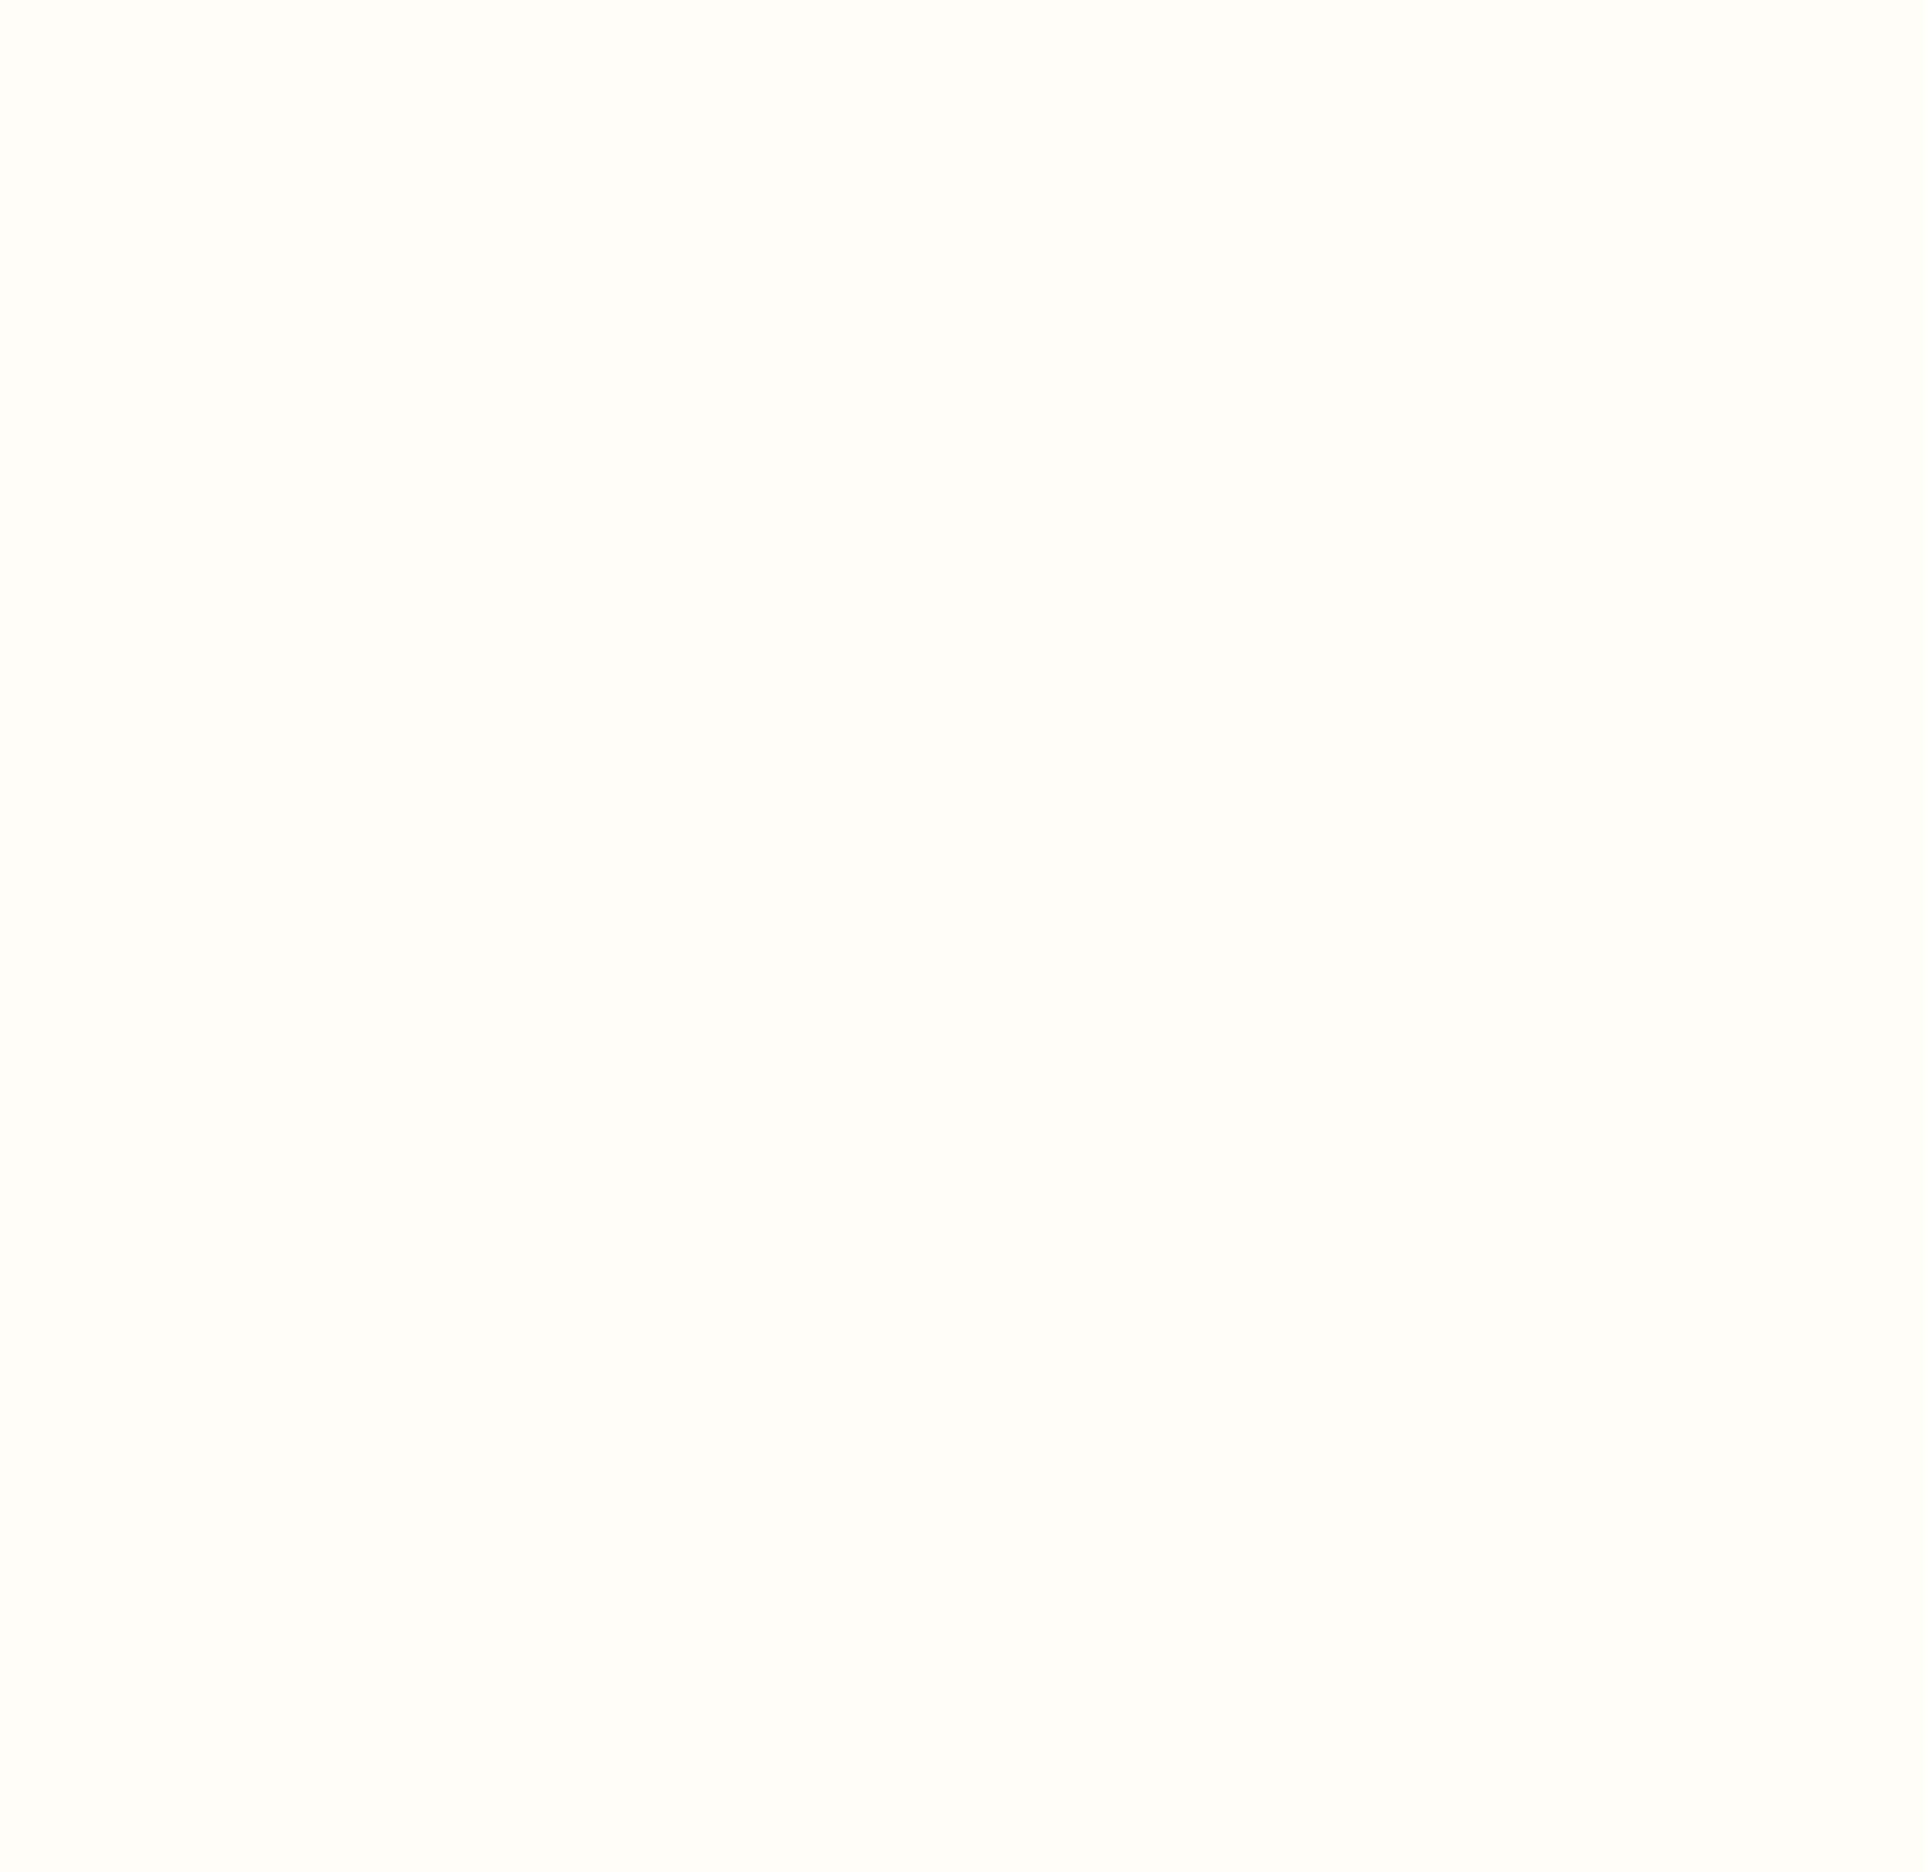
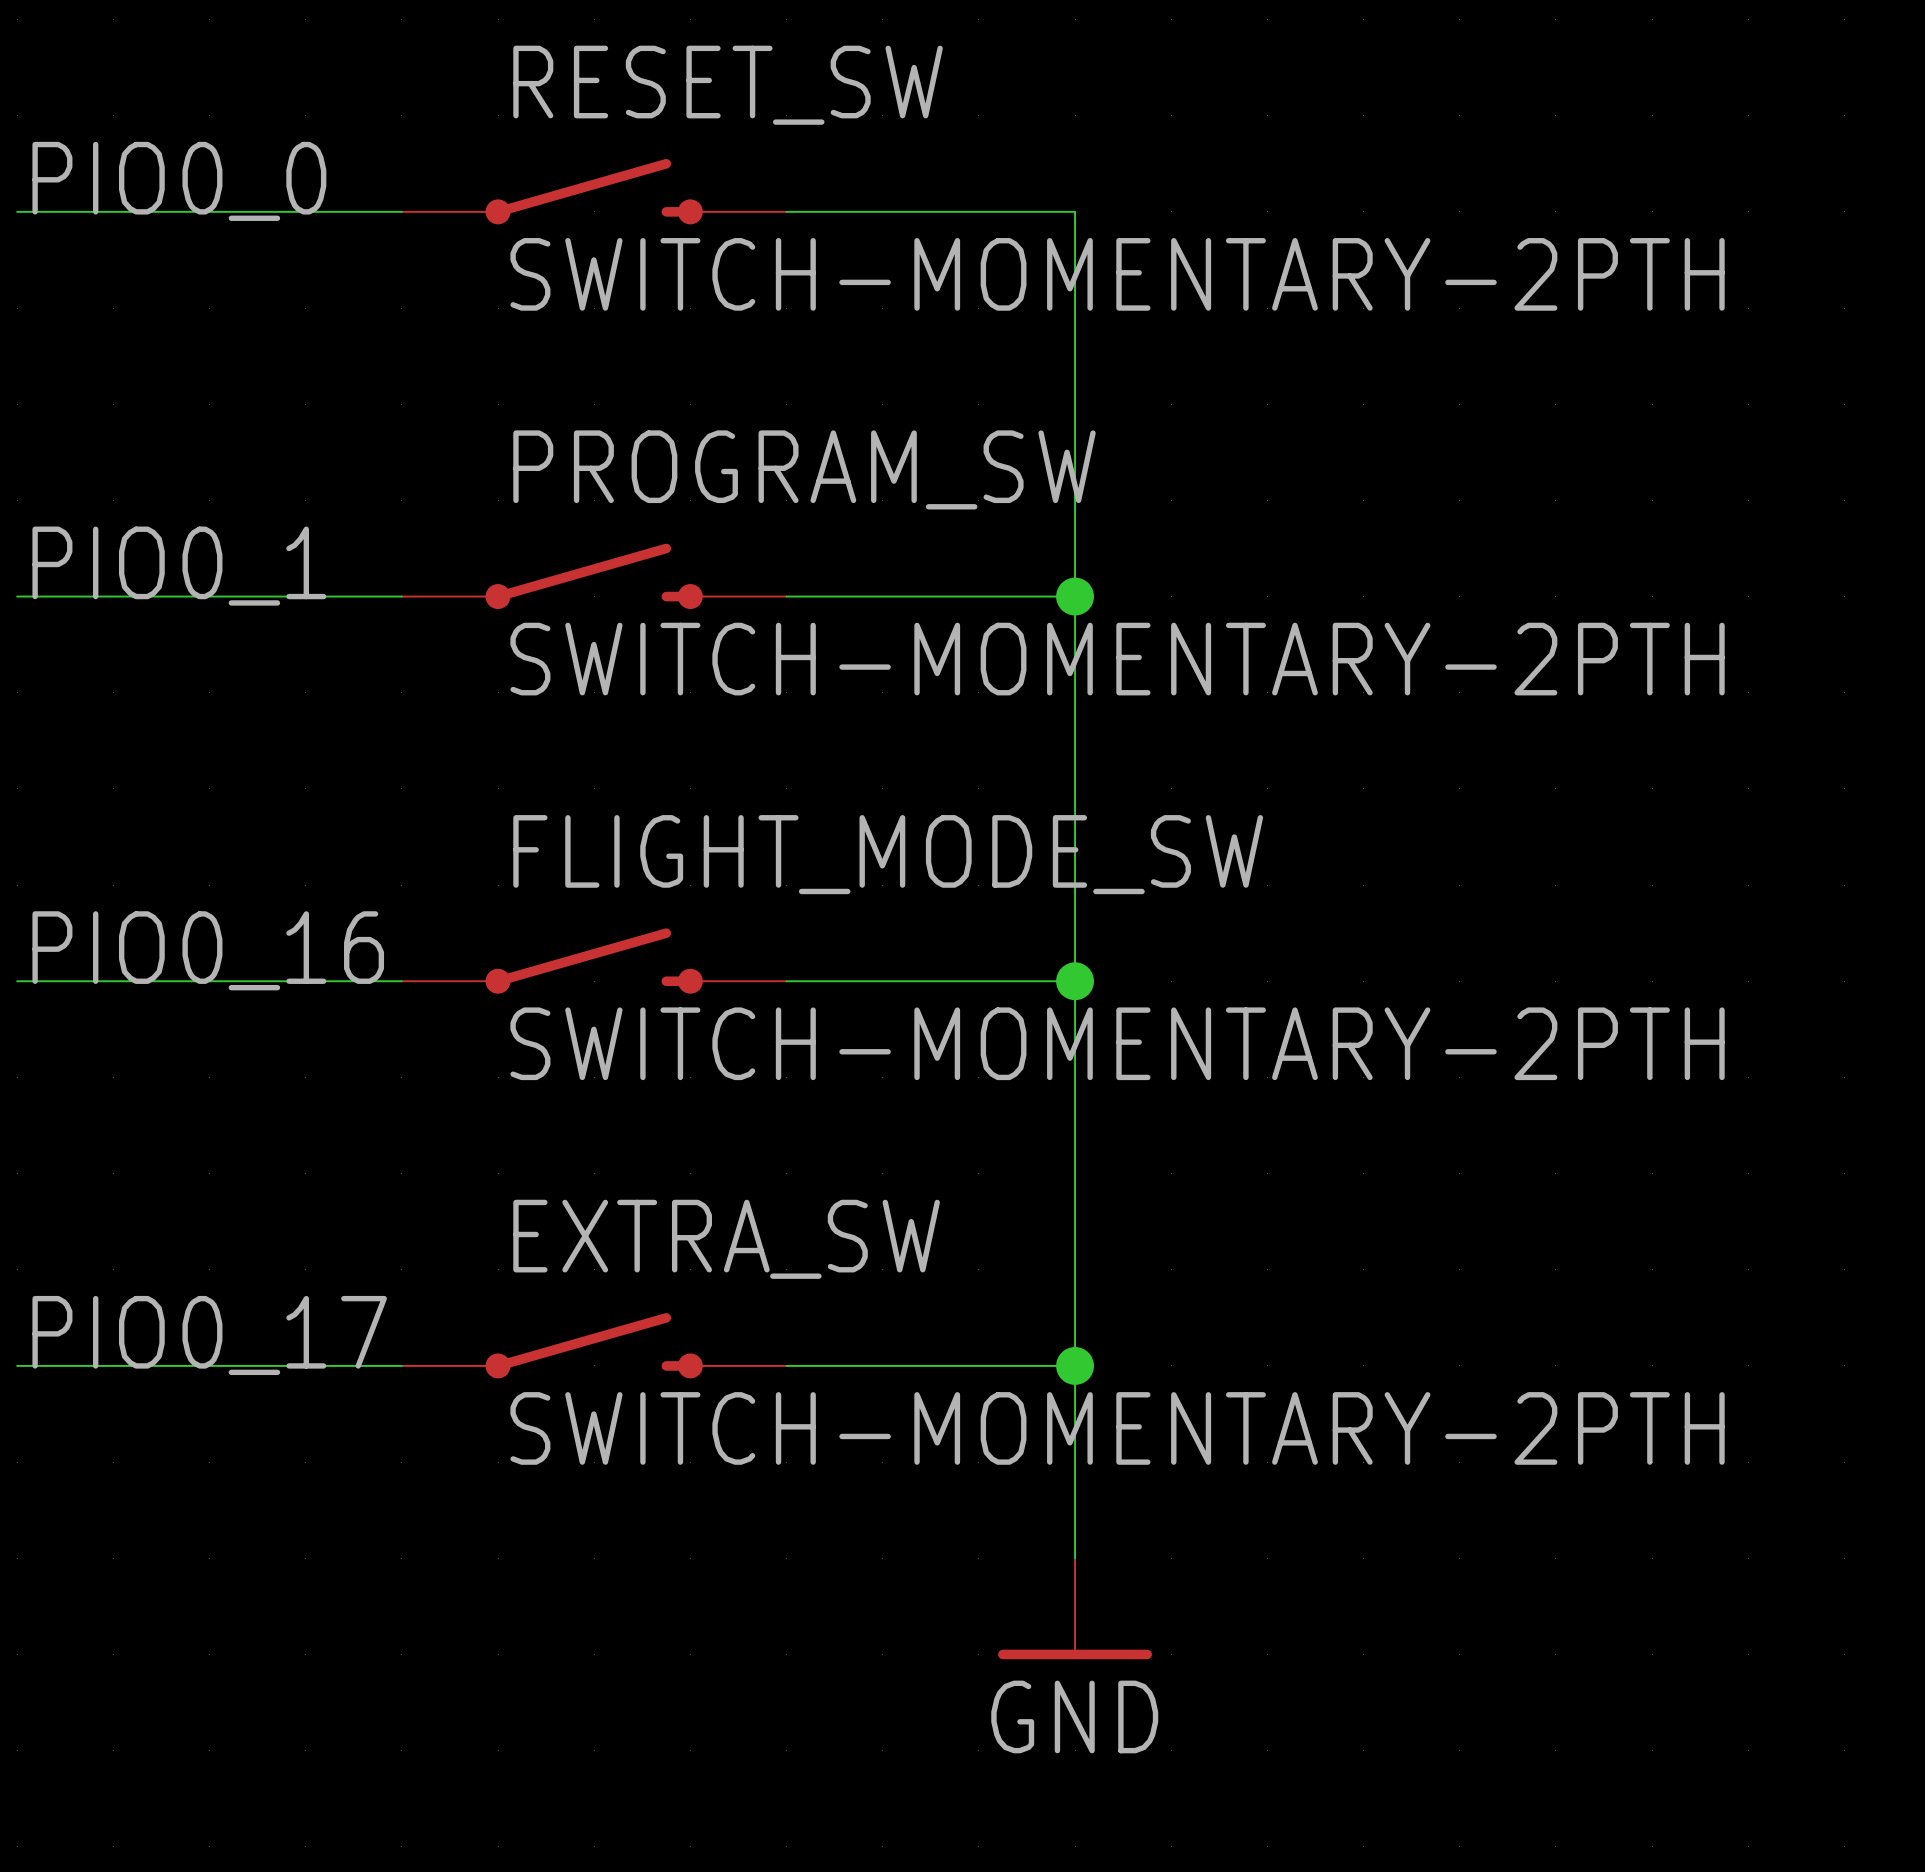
label: none -> PIO0_0 (179, 181)
RESET_SW: none -> SWITCH-MOMENTARY-2PTH (594, 191)
wire: none -> (17, 211) (401, 211)
wire: none -> (786, 211) (1075, 211) (1075, 1558)
label: none -> PIO0_1 (179, 566)
PROGRAM_SW: none -> SWITCH-MOMENTARY-2PTH (594, 576)
wire: none -> (17, 596) (401, 596)
wire: none -> (786, 596) (1075, 596)
junction: none -> (1075, 596)
label: none -> PIO0_16 (208, 950)
FLIGHT_MODE_SW: none -> SWITCH-MOMENTARY-2PTH (594, 961)
wire: none -> (17, 981) (401, 981)
wire: none -> (786, 981) (1075, 981)
junction: none -> (1075, 981)
label: none -> PIO0_17 (209, 1335)
EXTRA_SW: none -> SWITCH-MOMENTARY-2PTH (594, 1345)
wire: none -> (17, 1365) (401, 1365)
wire: none -> (786, 1365) (1075, 1365)
junction: none -> (1075, 1365)
power symbol: none -> GND (1075, 1608)

